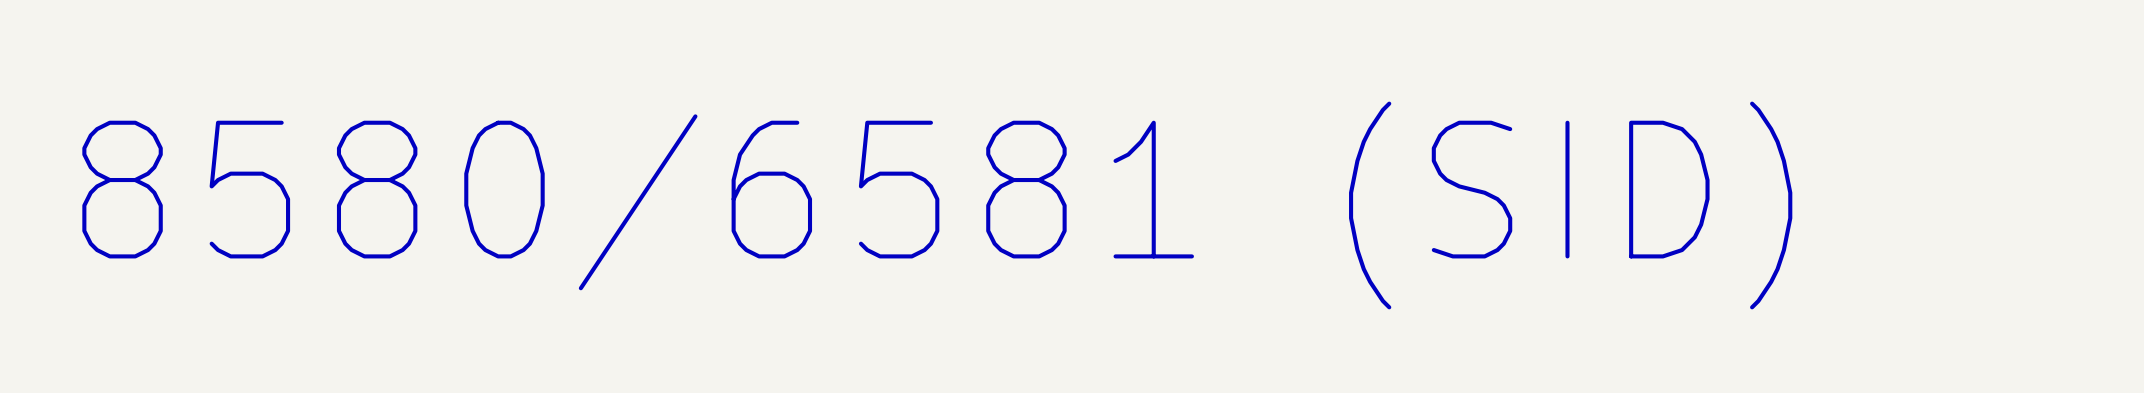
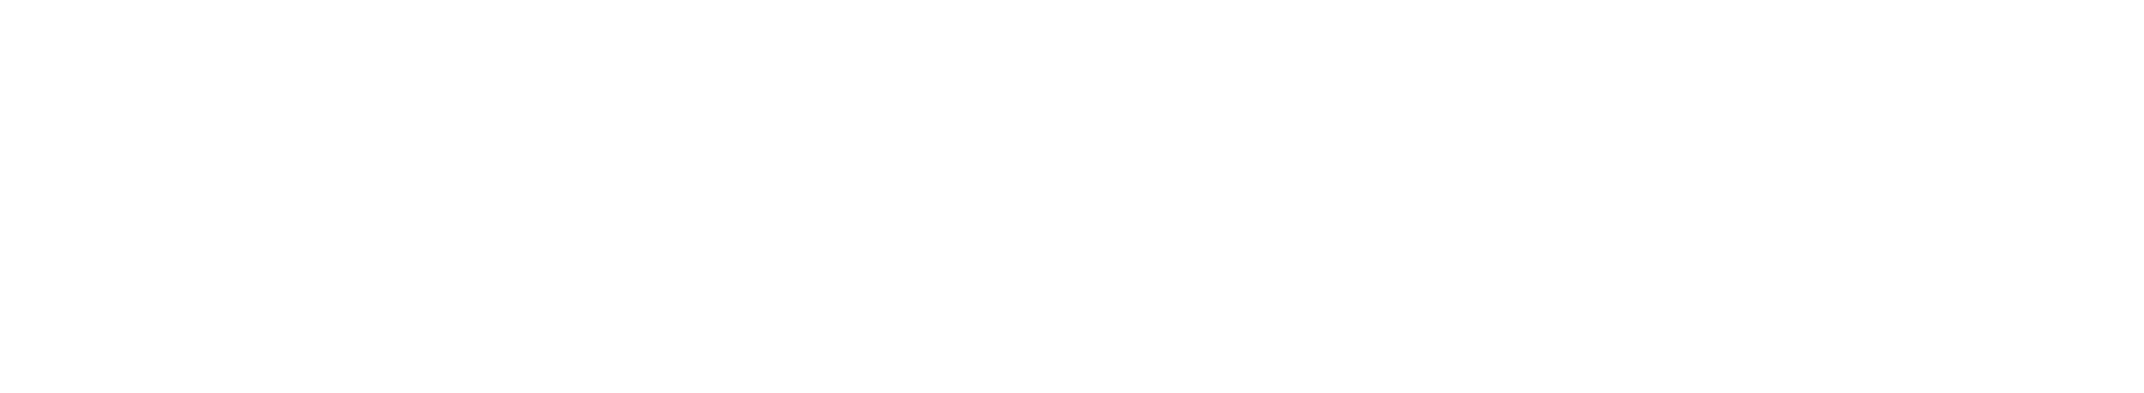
text: 8580/6581 (SID) (937, 205) -> none

